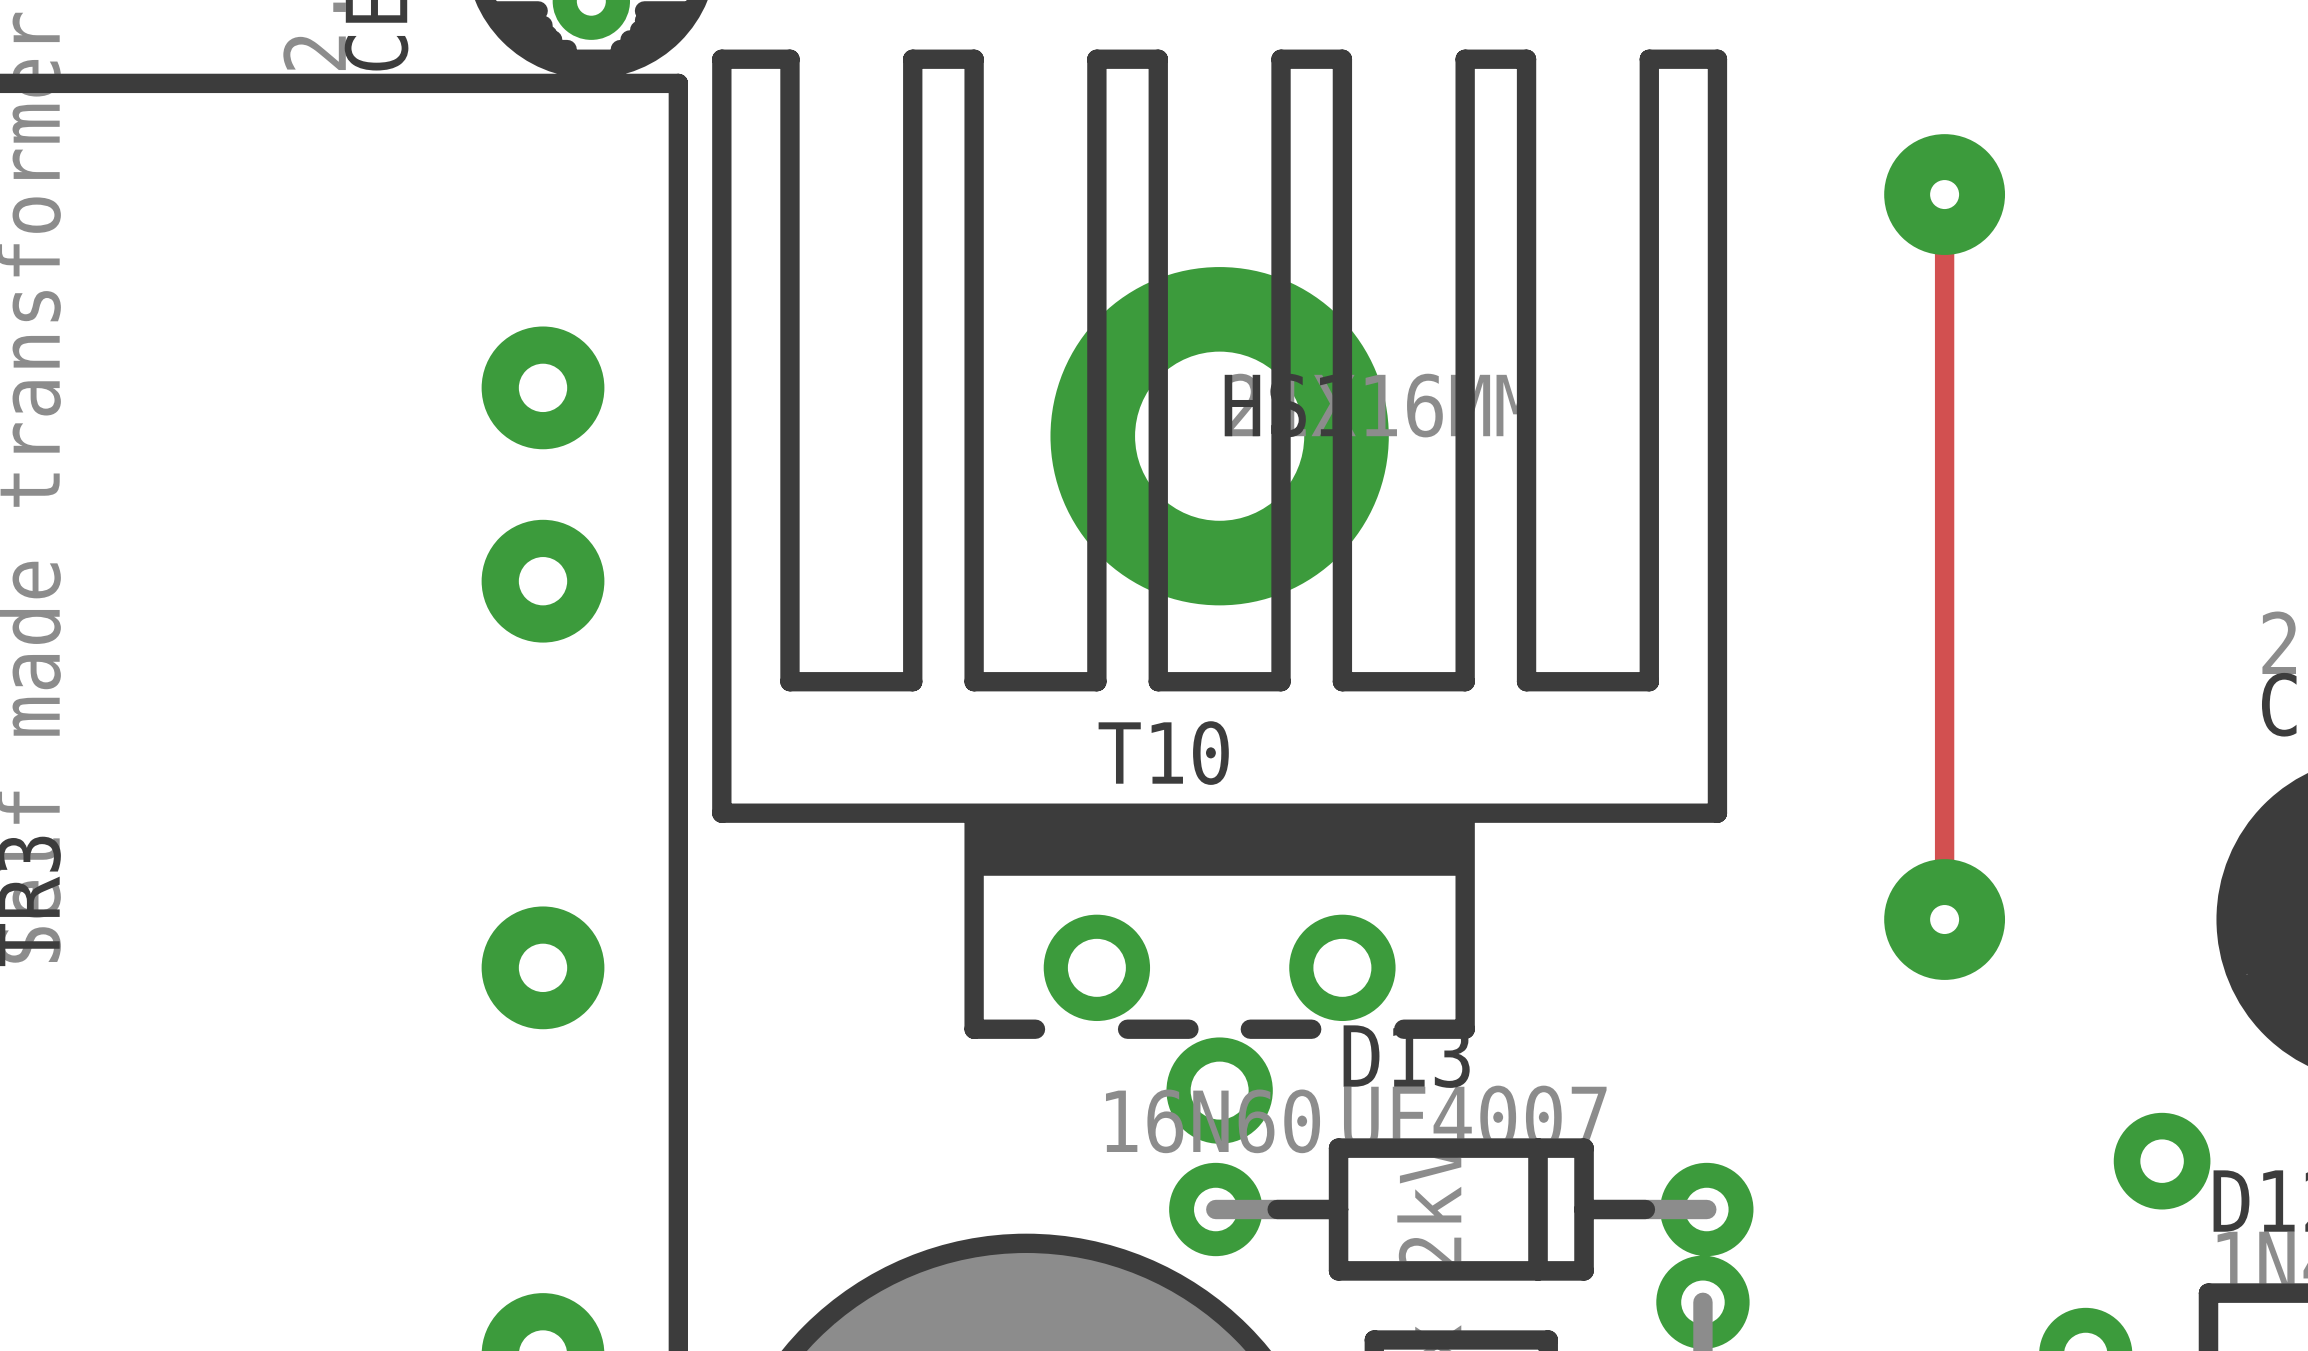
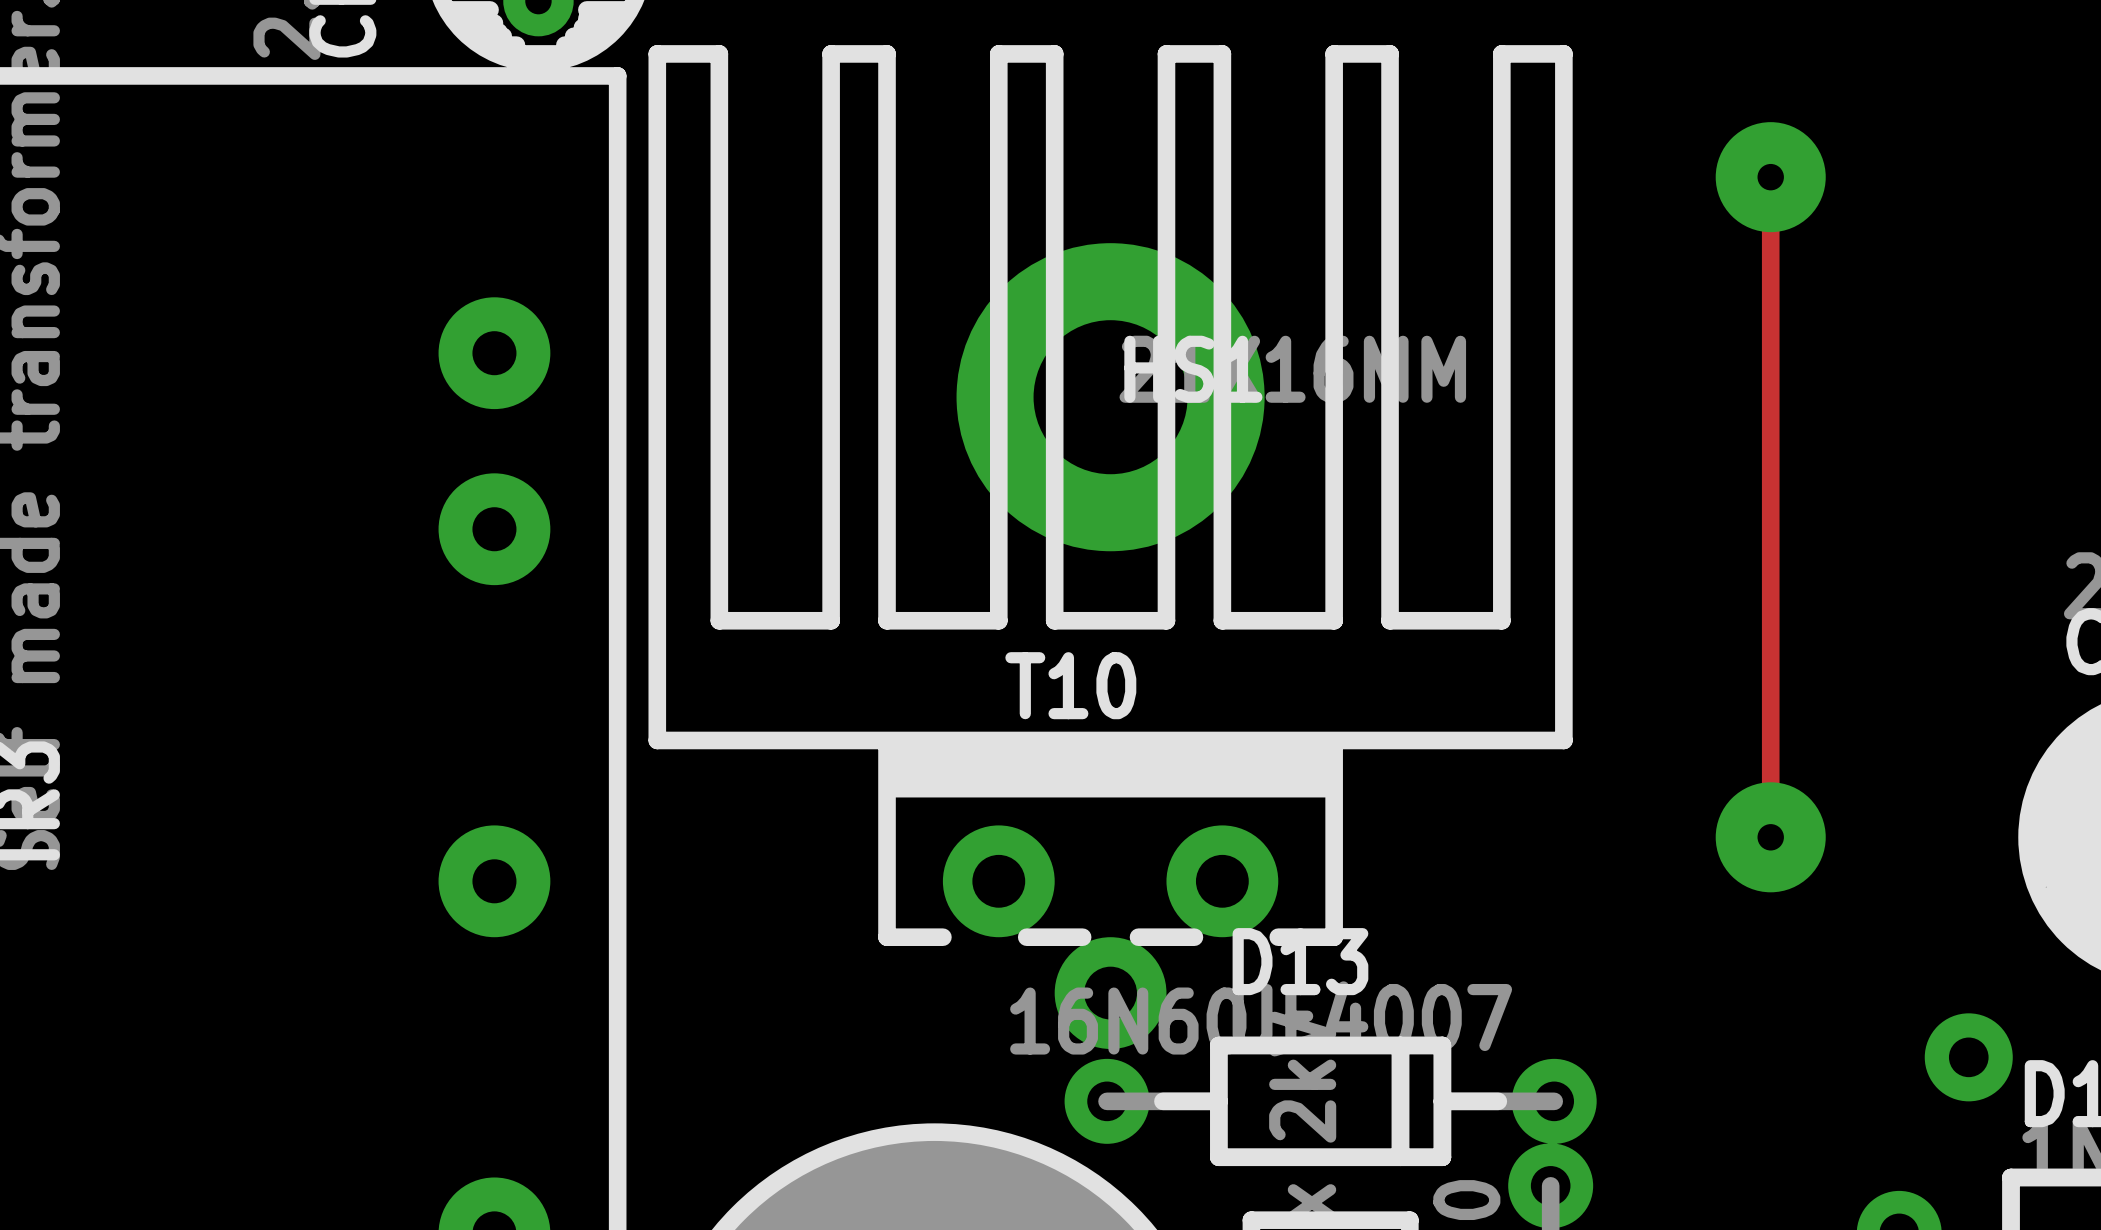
T10 footprint: [964, 804, 1475, 1144] -> [878, 732, 1343, 1049]

